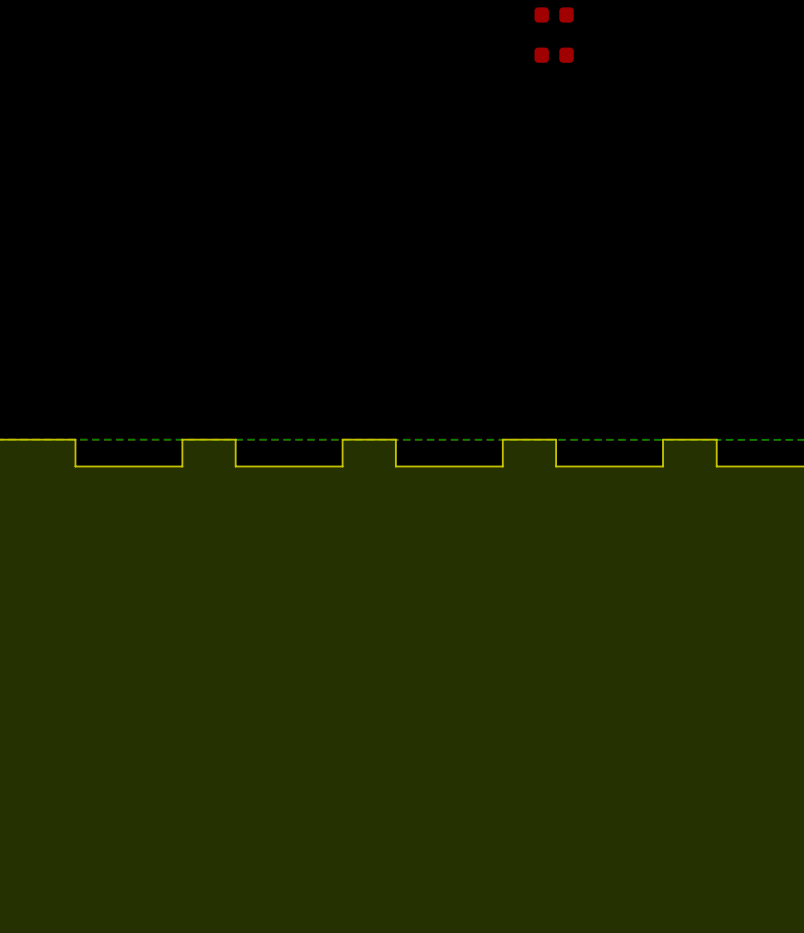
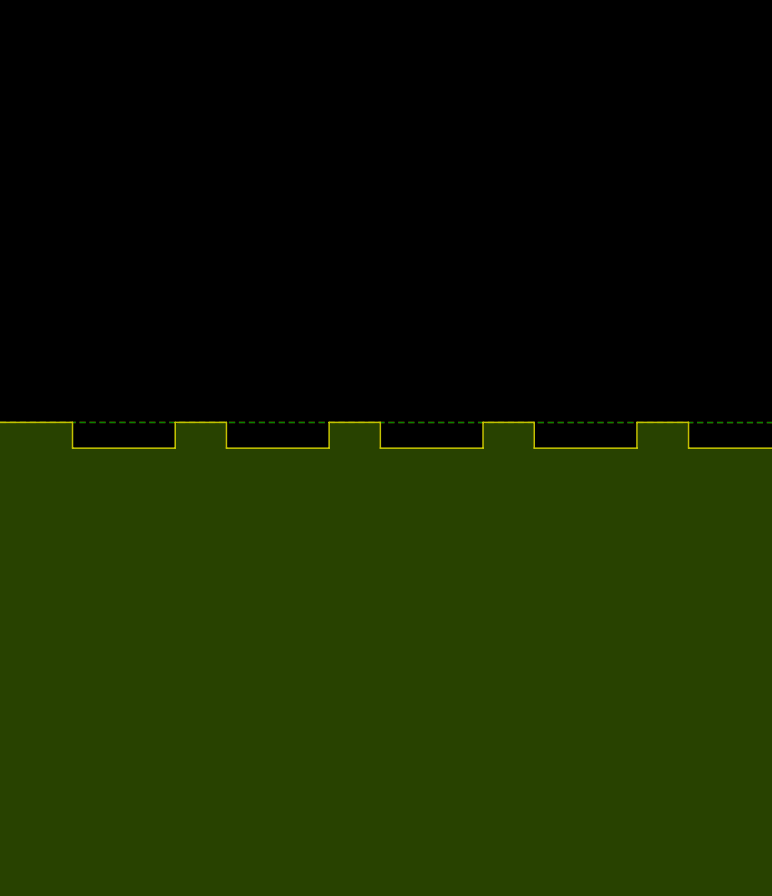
part: (554, 14) -> none
part: (554, 55) -> none

